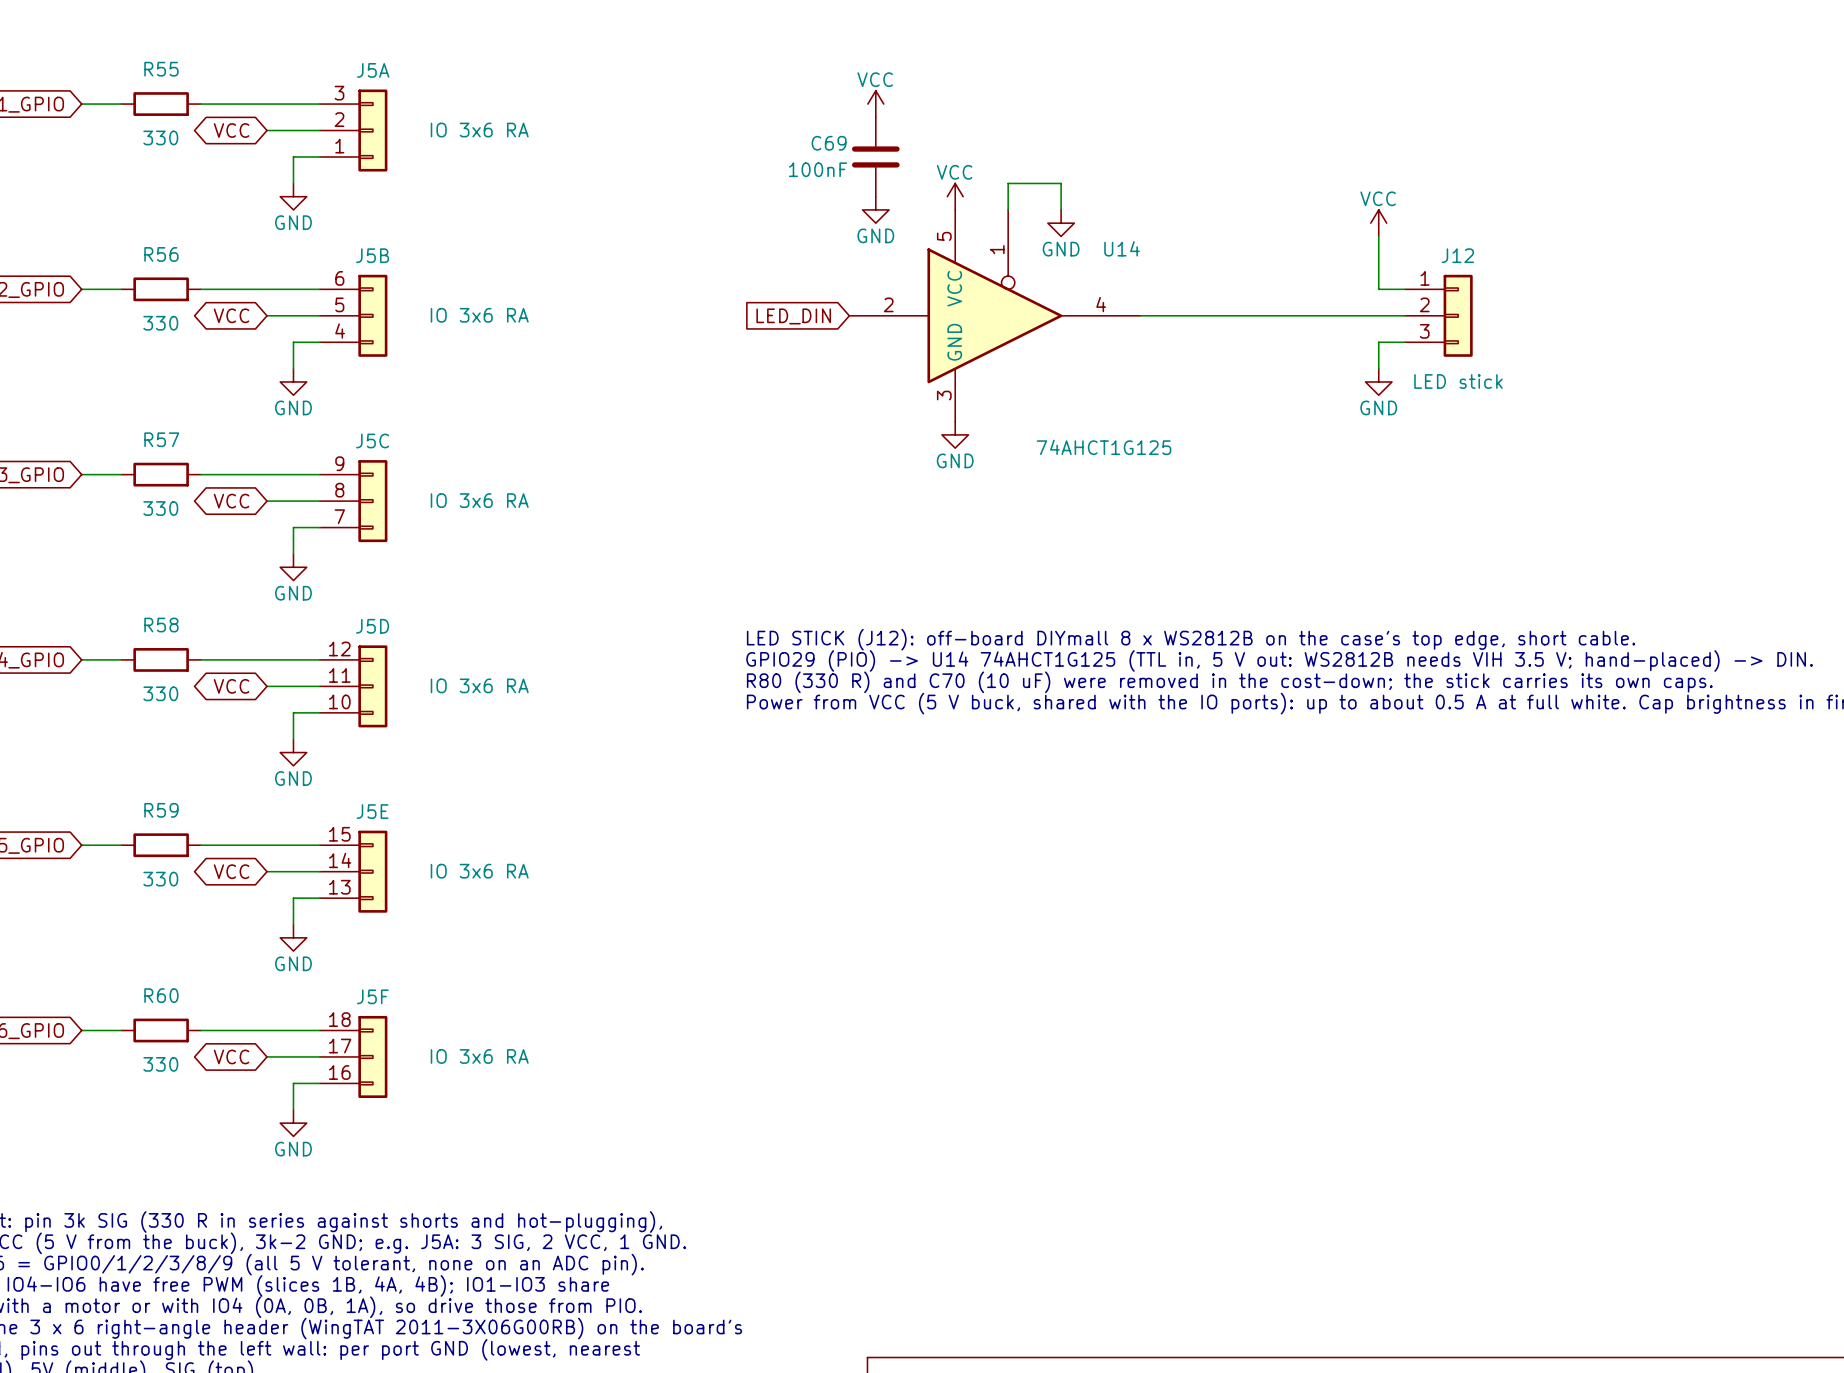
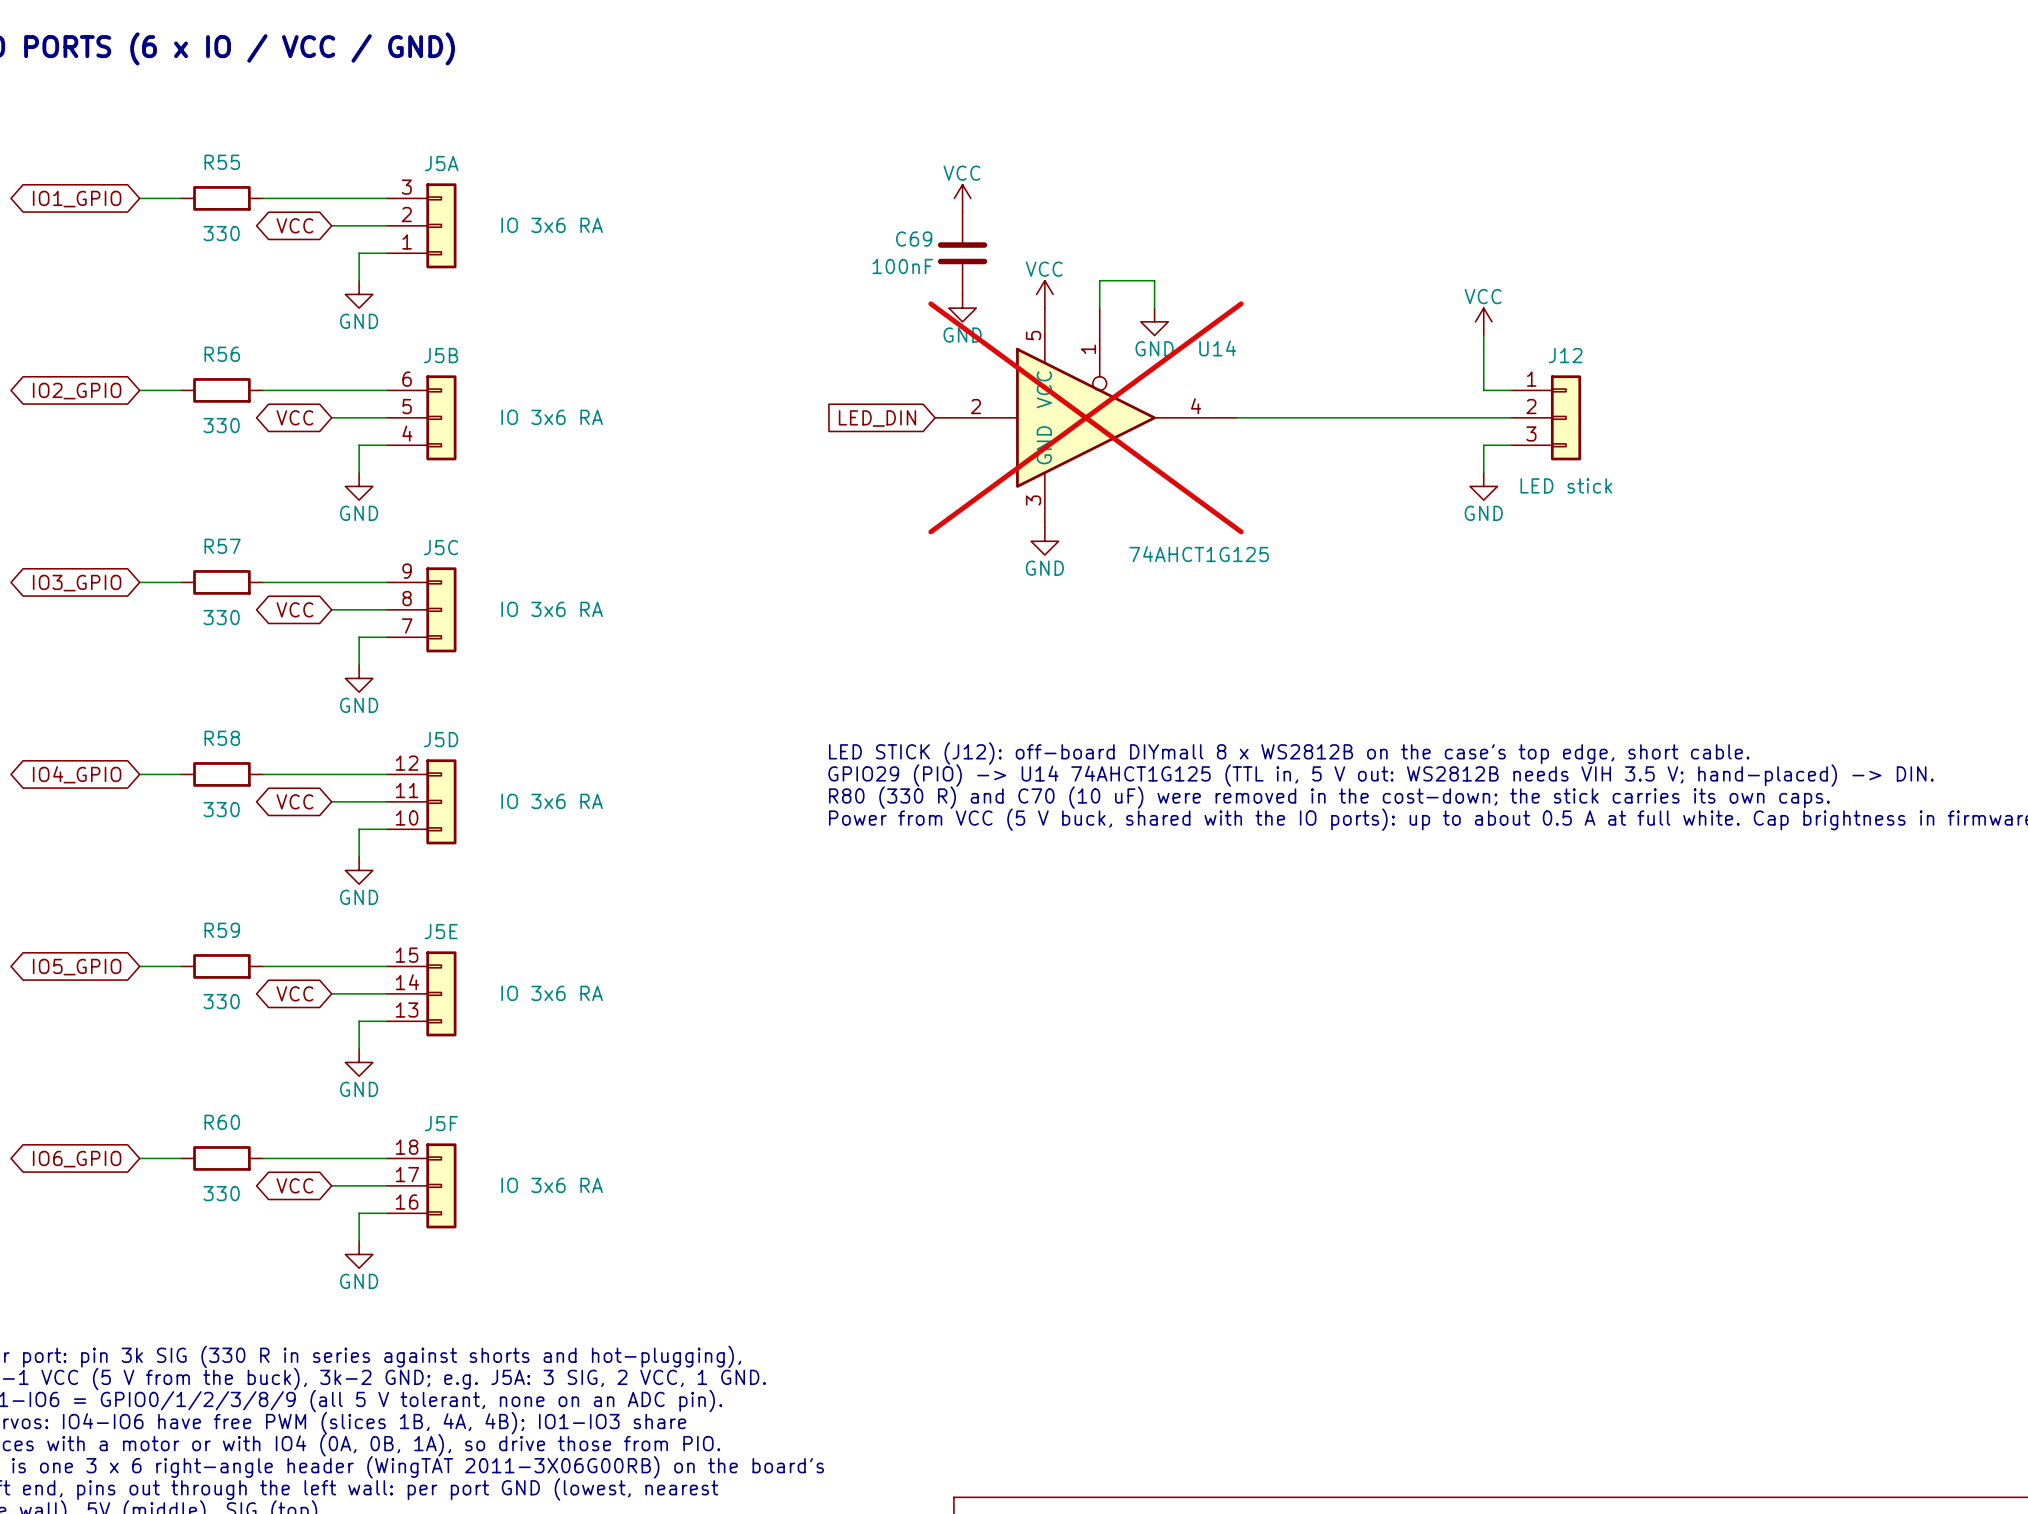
U14 do-not-place cross: none -> (1086, 417)

